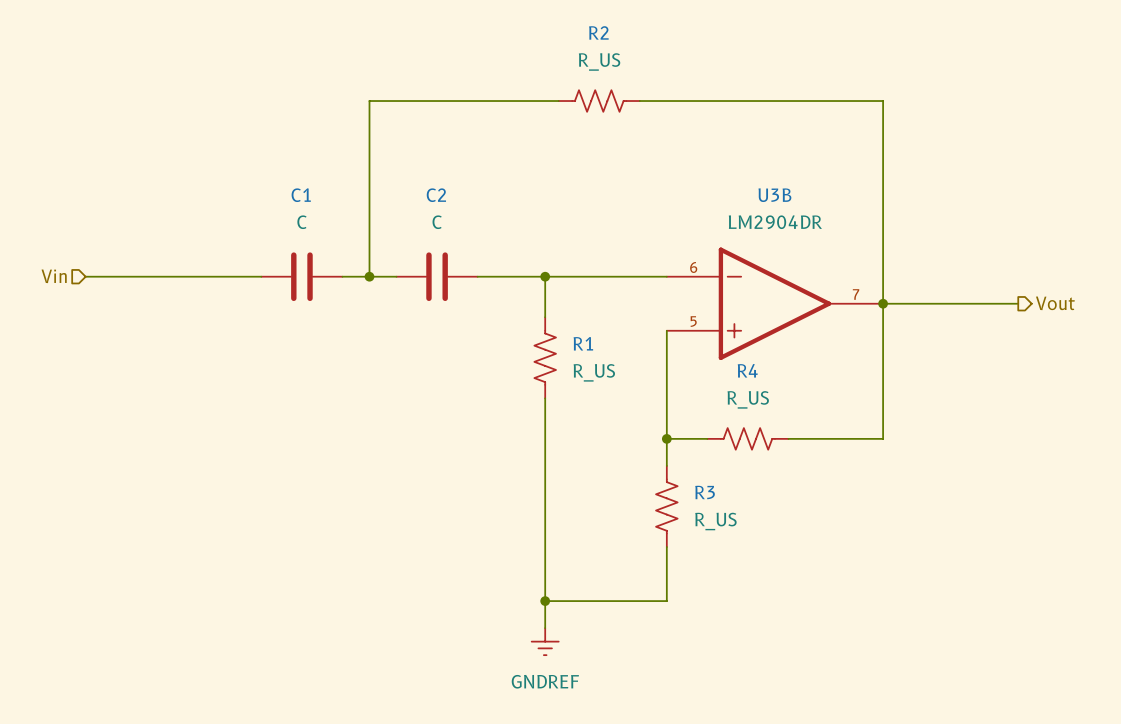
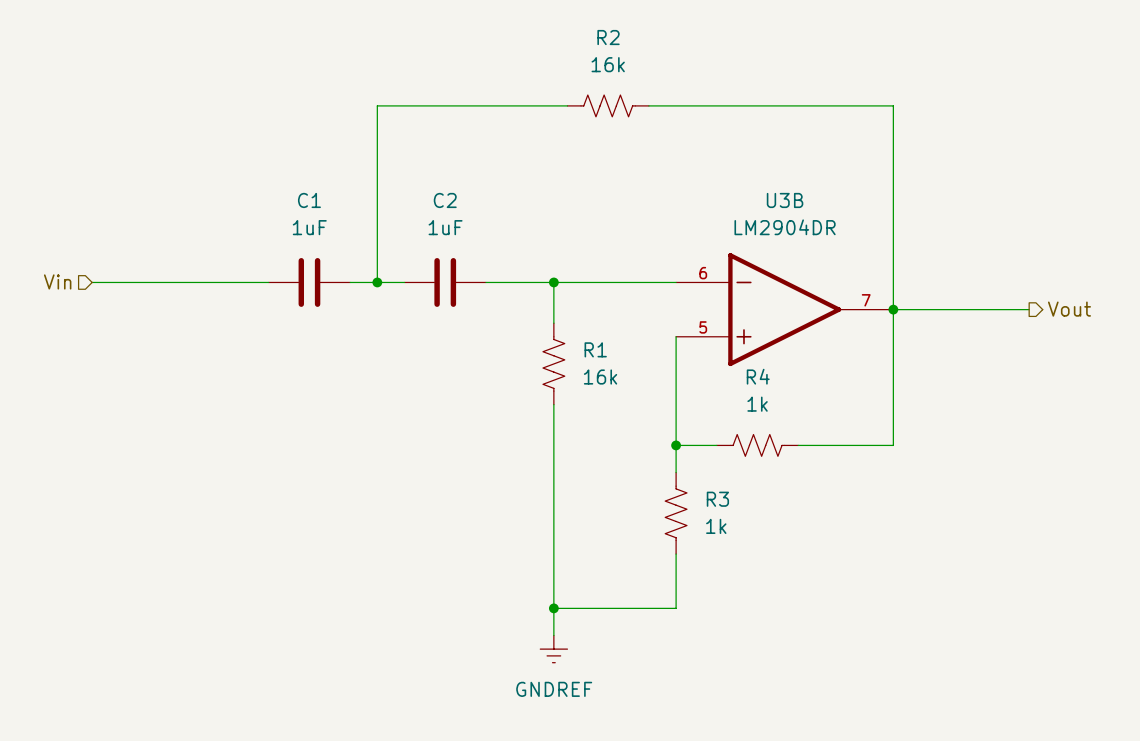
R2 value: R_US (599, 61) -> 16k (608, 64)
C1 value: C (301, 222) -> 1uF (309, 227)
C2 value: C (437, 222) -> 1uF (445, 227)
R1 value: R_US (594, 372) -> 16k (600, 377)
R4 value: R_US (748, 399) -> 1k (757, 404)
R3 value: R_US (715, 521) -> 1k (716, 526)

